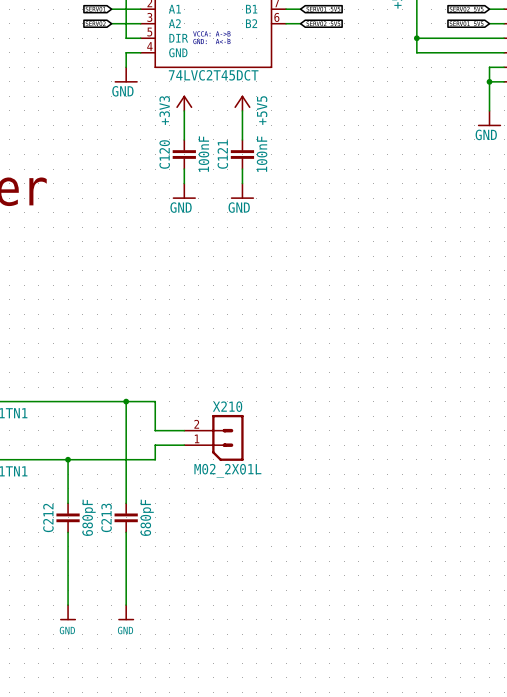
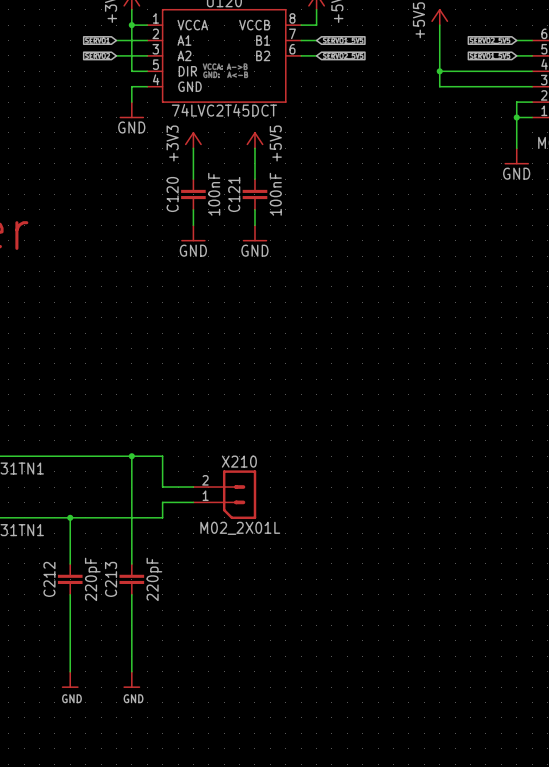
C212 value: 680pF (89, 517) -> 220pF (92, 579)
C213 value: 680pF (147, 517) -> 220pF (154, 579)

